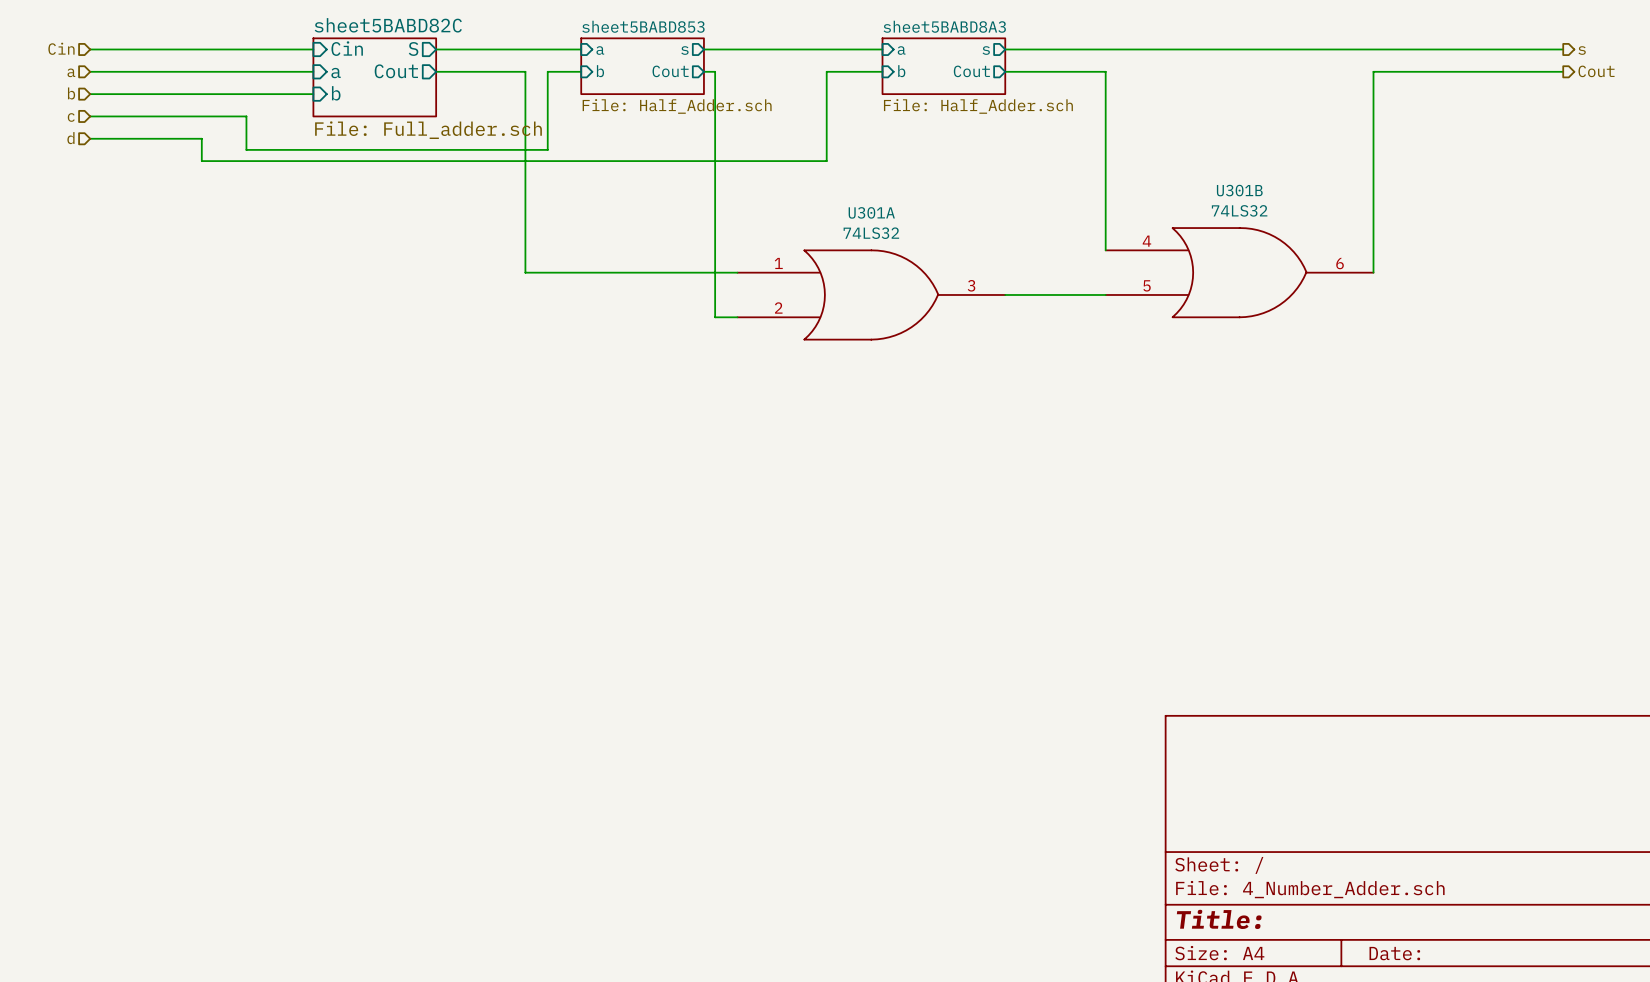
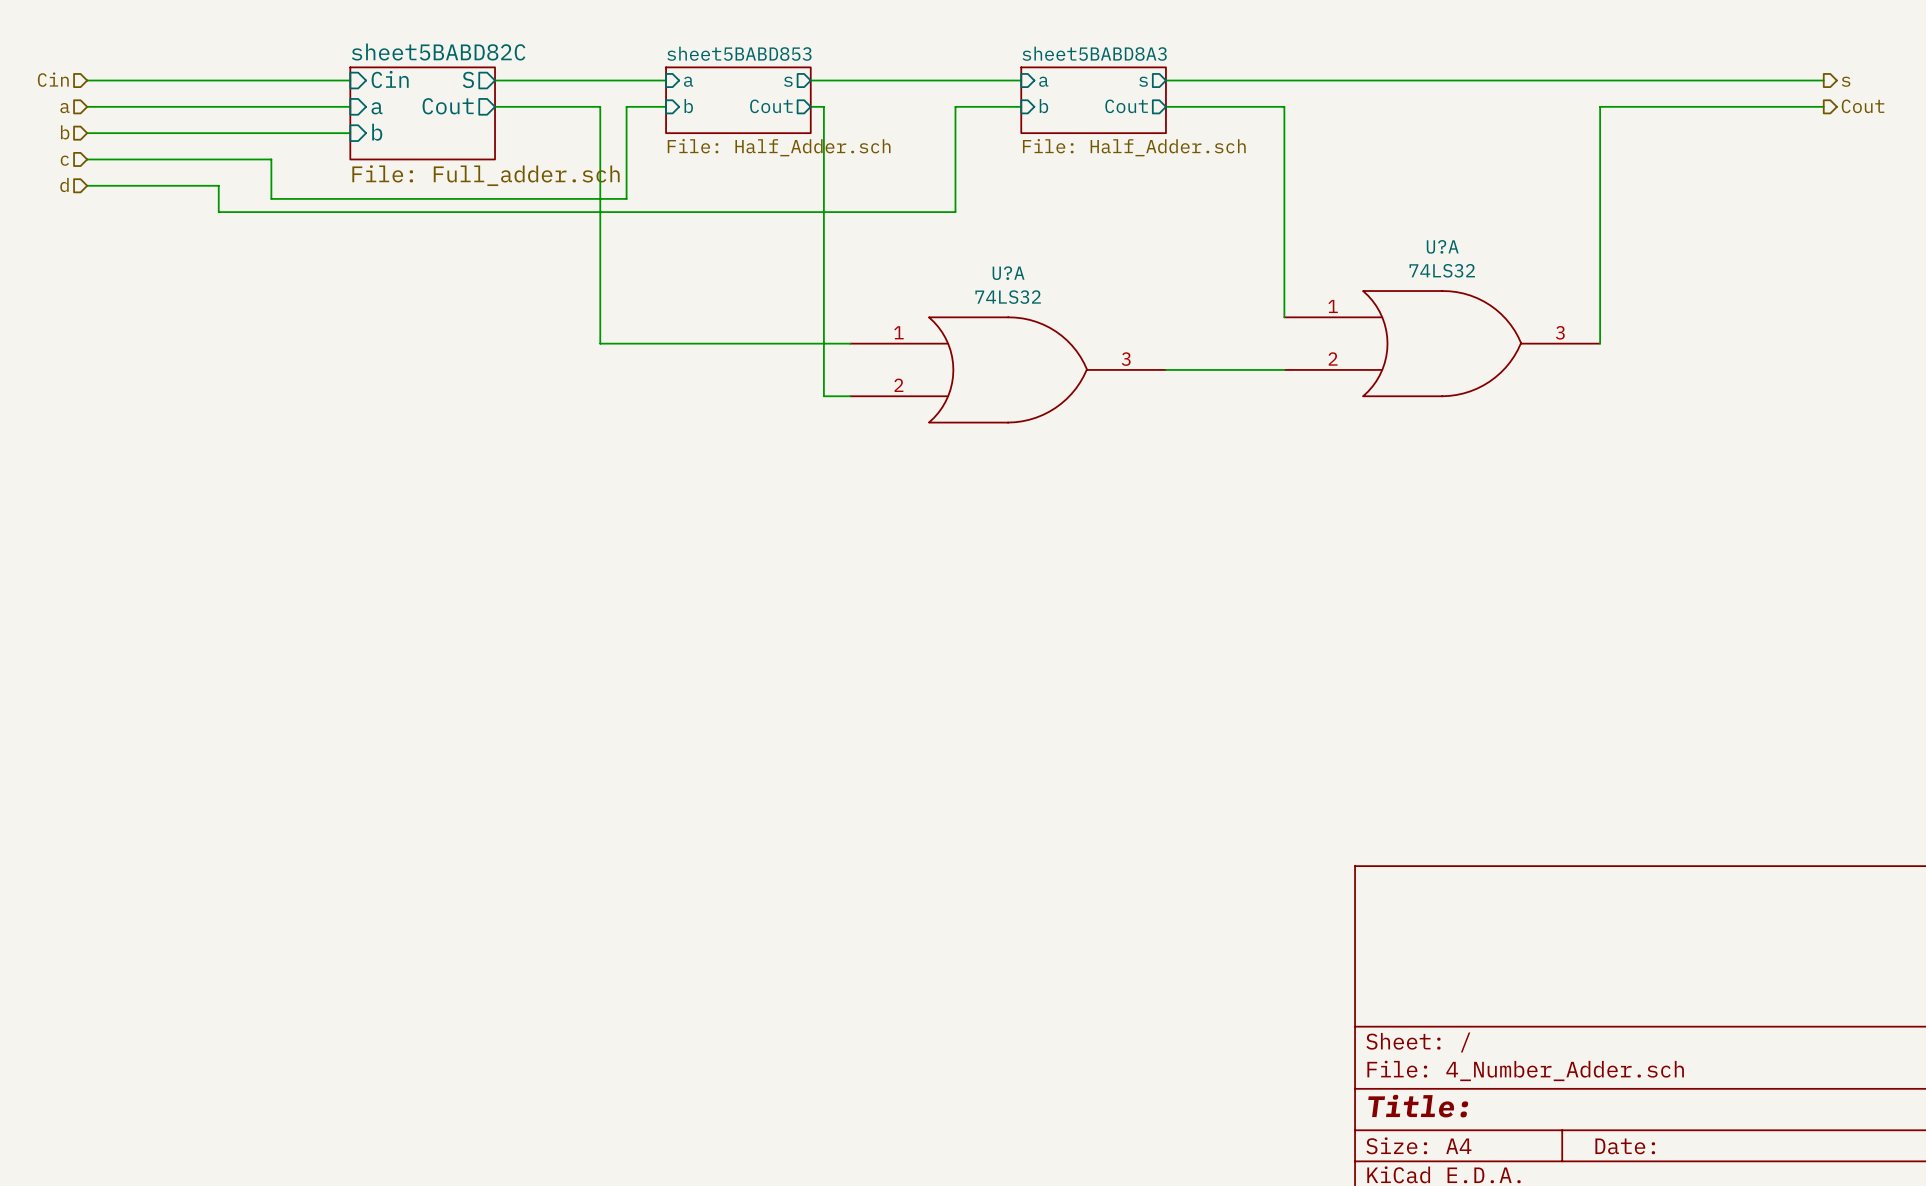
U301B name: U301B (1239, 190) -> U?A (1442, 246)
U301A name: U301A (871, 212) -> U?A (1008, 273)
U301B pin number: 4 (1146, 241) -> 1 (1333, 306)
U301B pin number: 6 (1340, 263) -> 3 (1560, 332)
U301B pin number: 5 (1147, 285) -> 2 (1333, 358)

